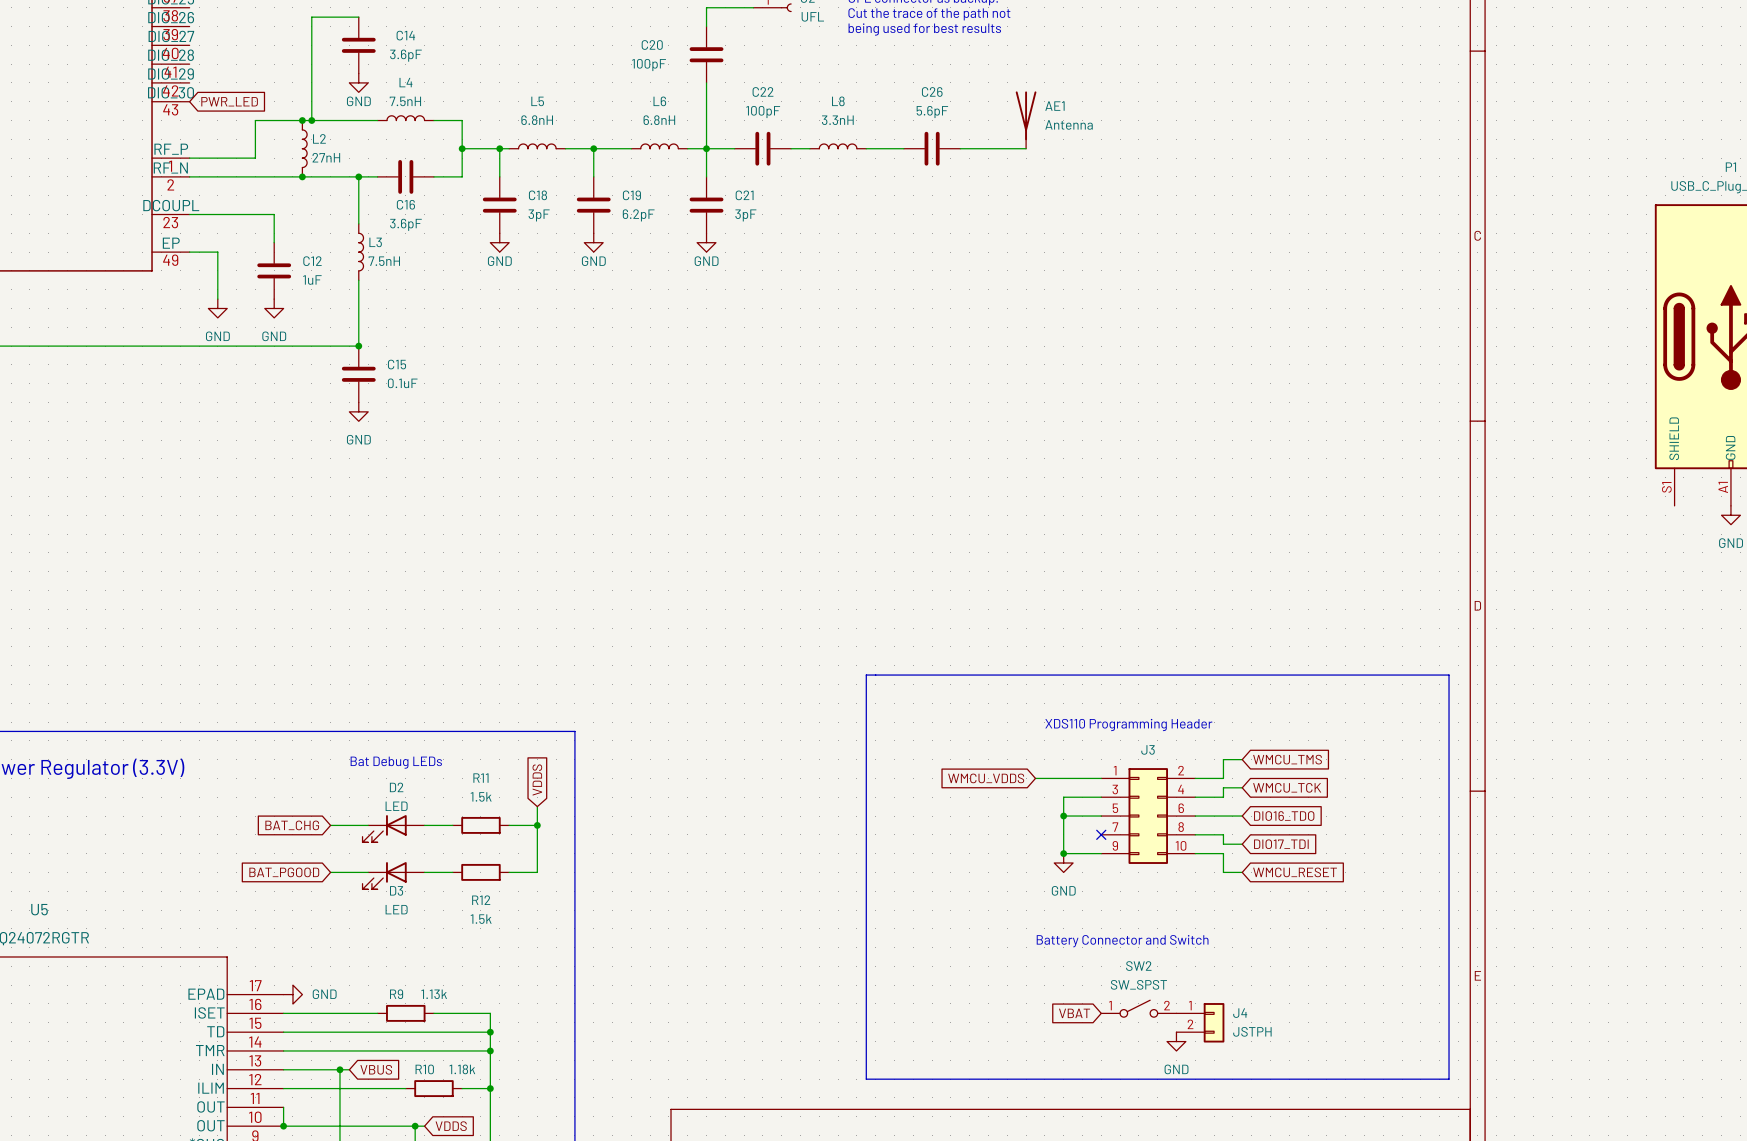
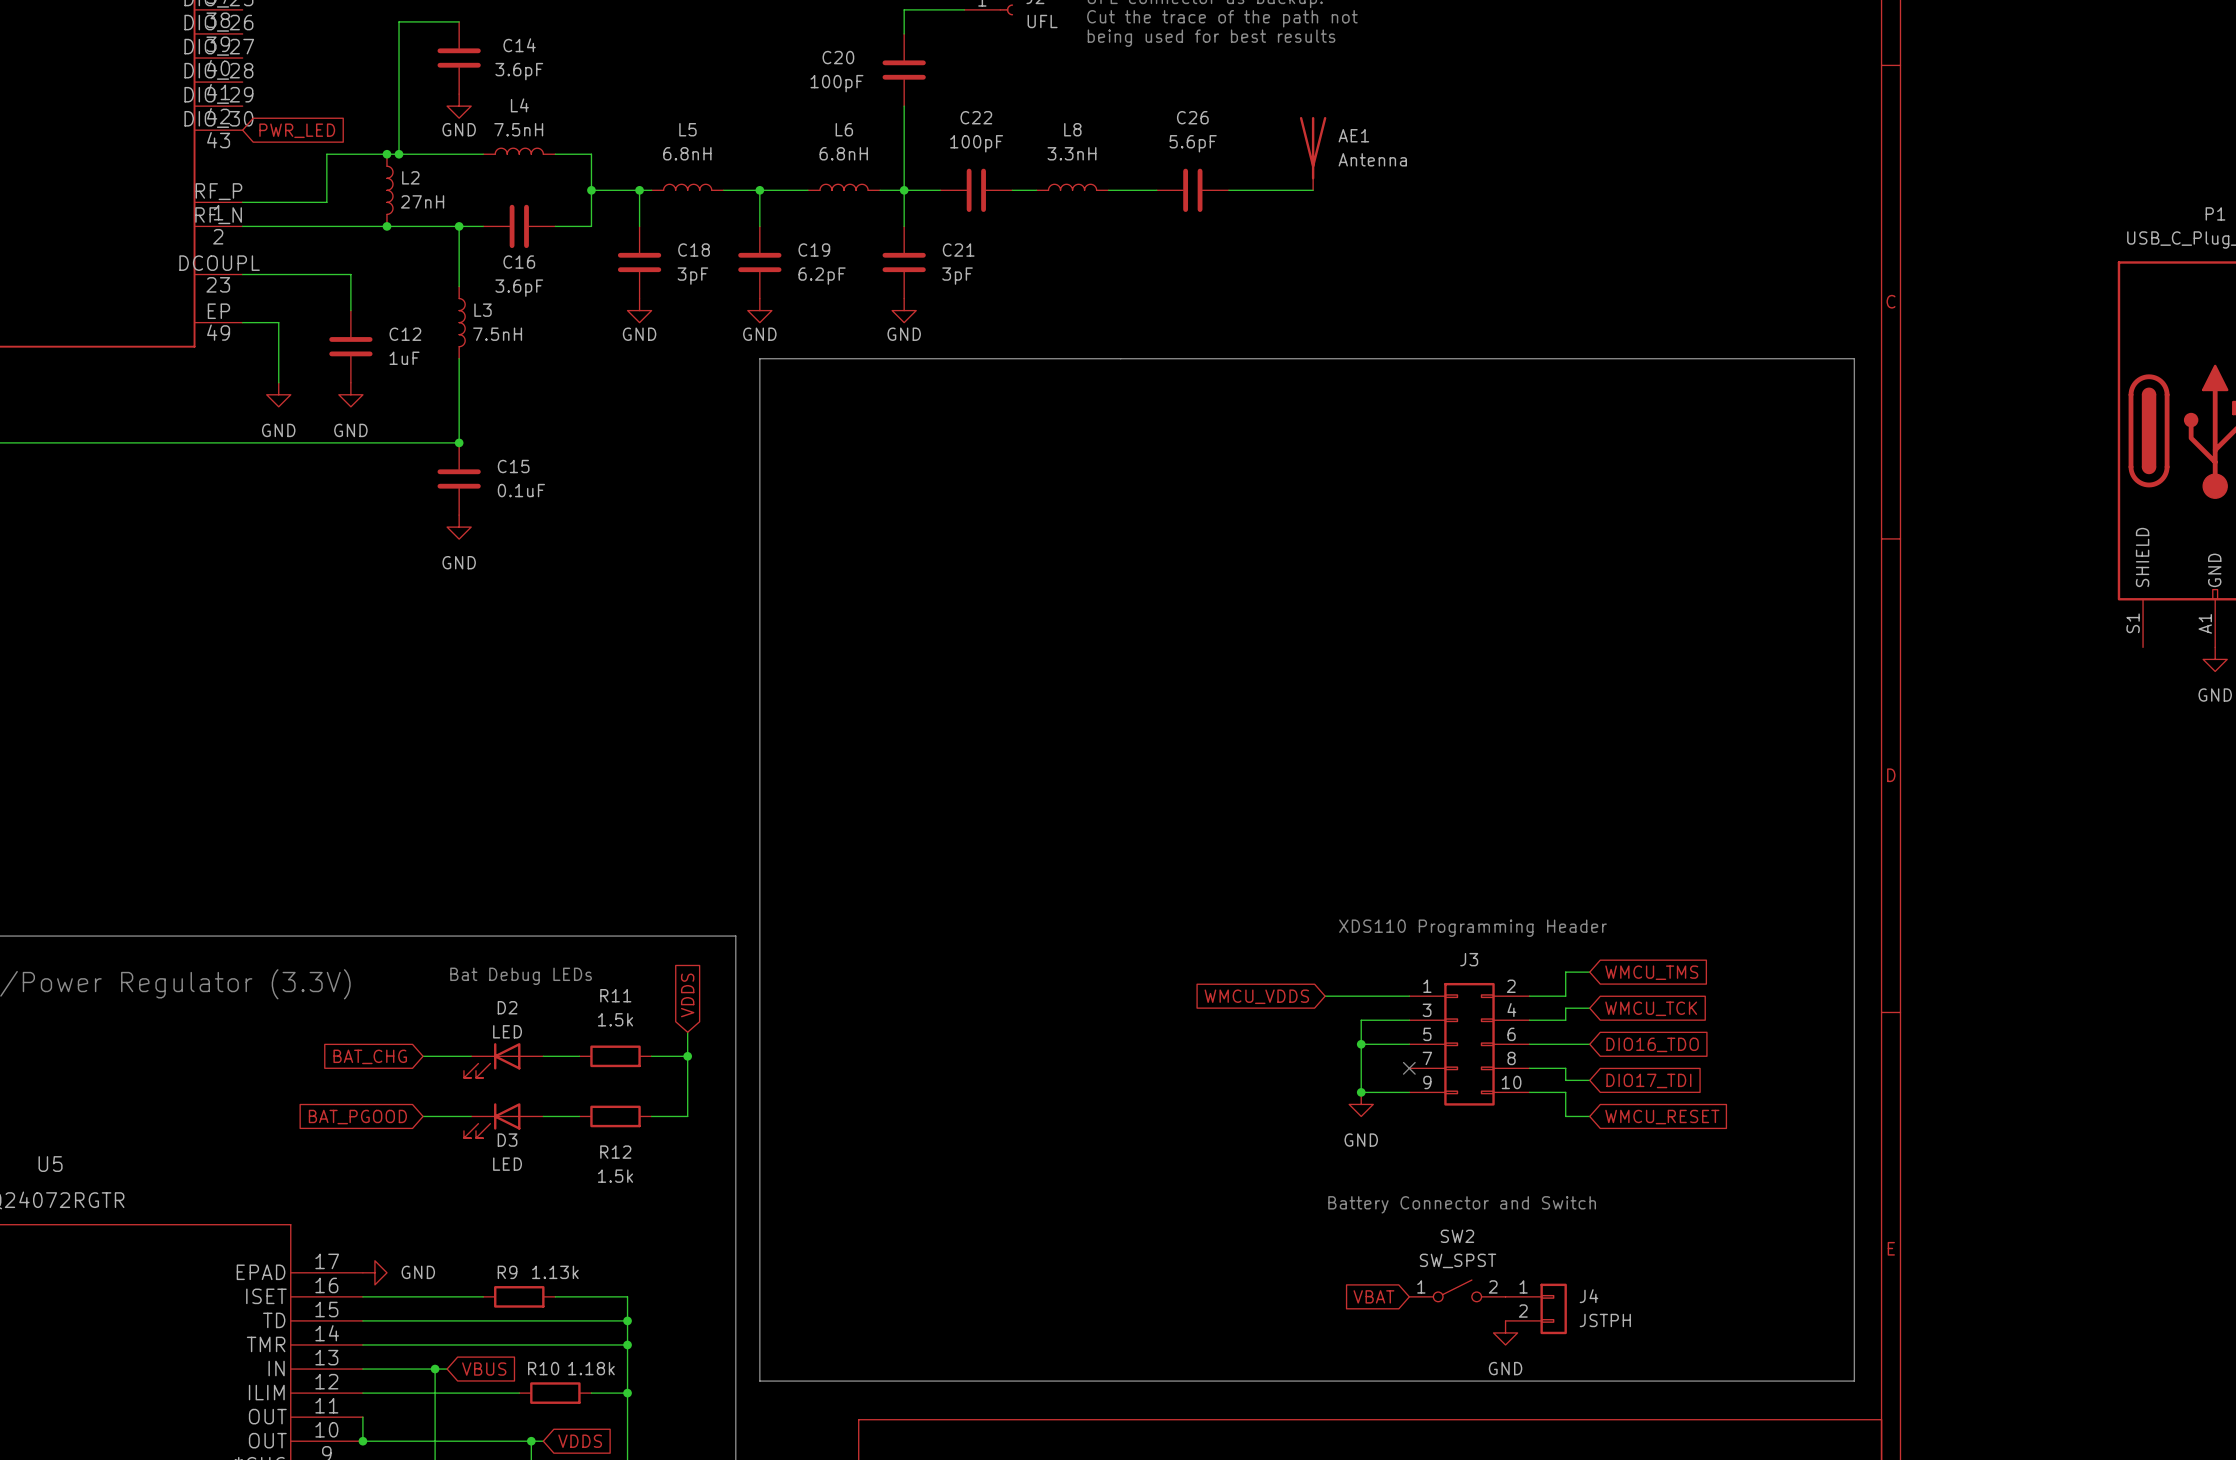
line: (1449, 675) (866, 675) (866, 1079) -> (1854, 863) (1854, 358) (759, 358) (759, 1381) (1108, 1381)

